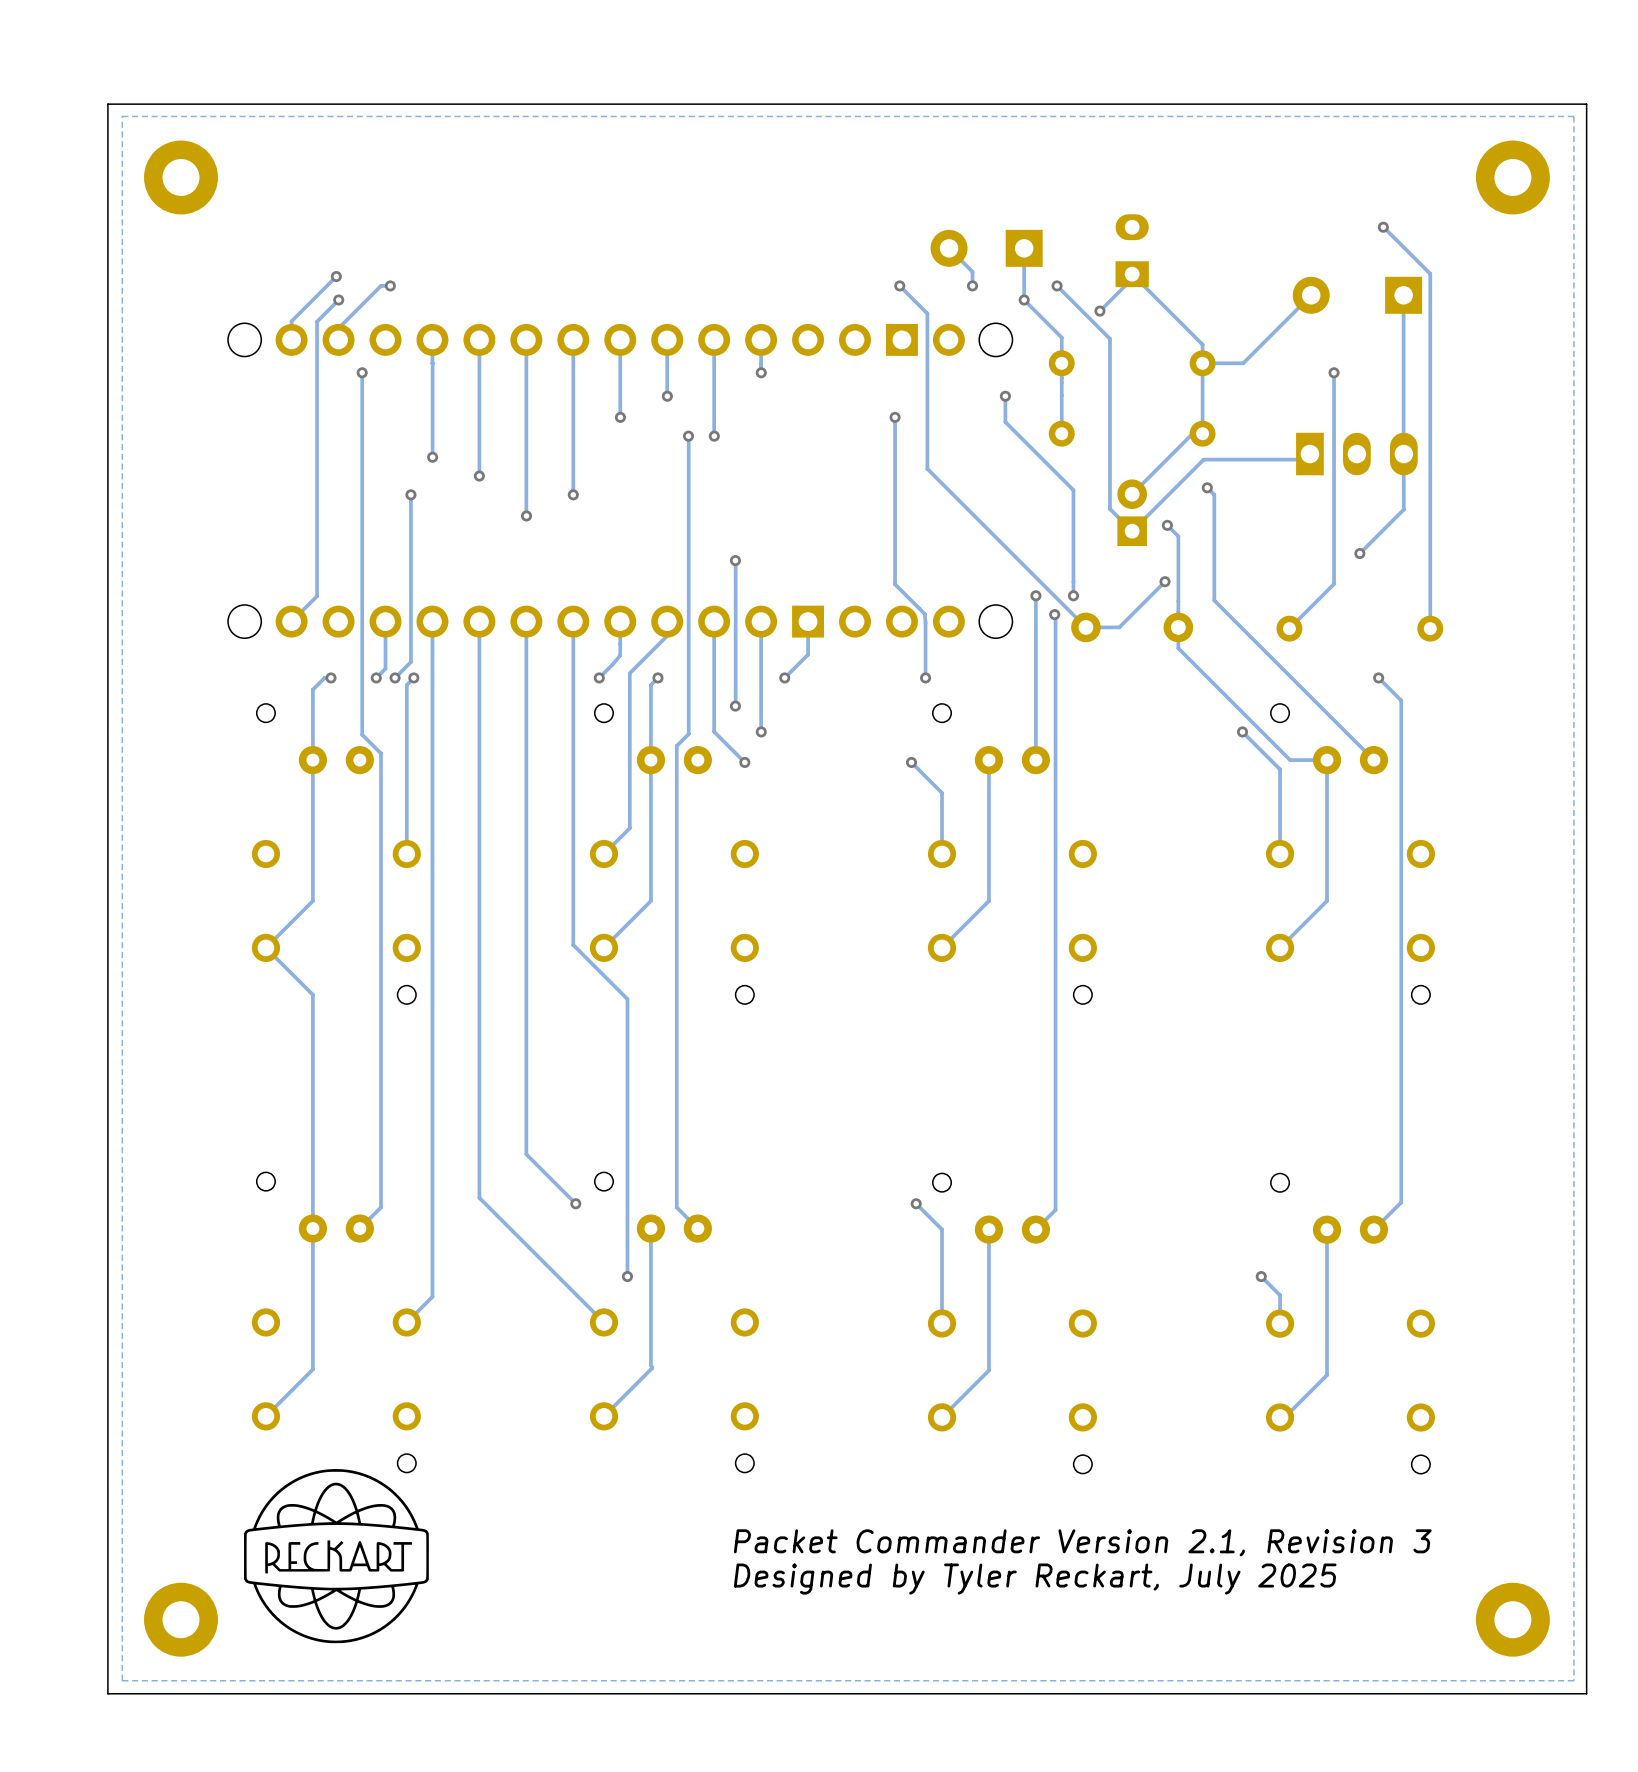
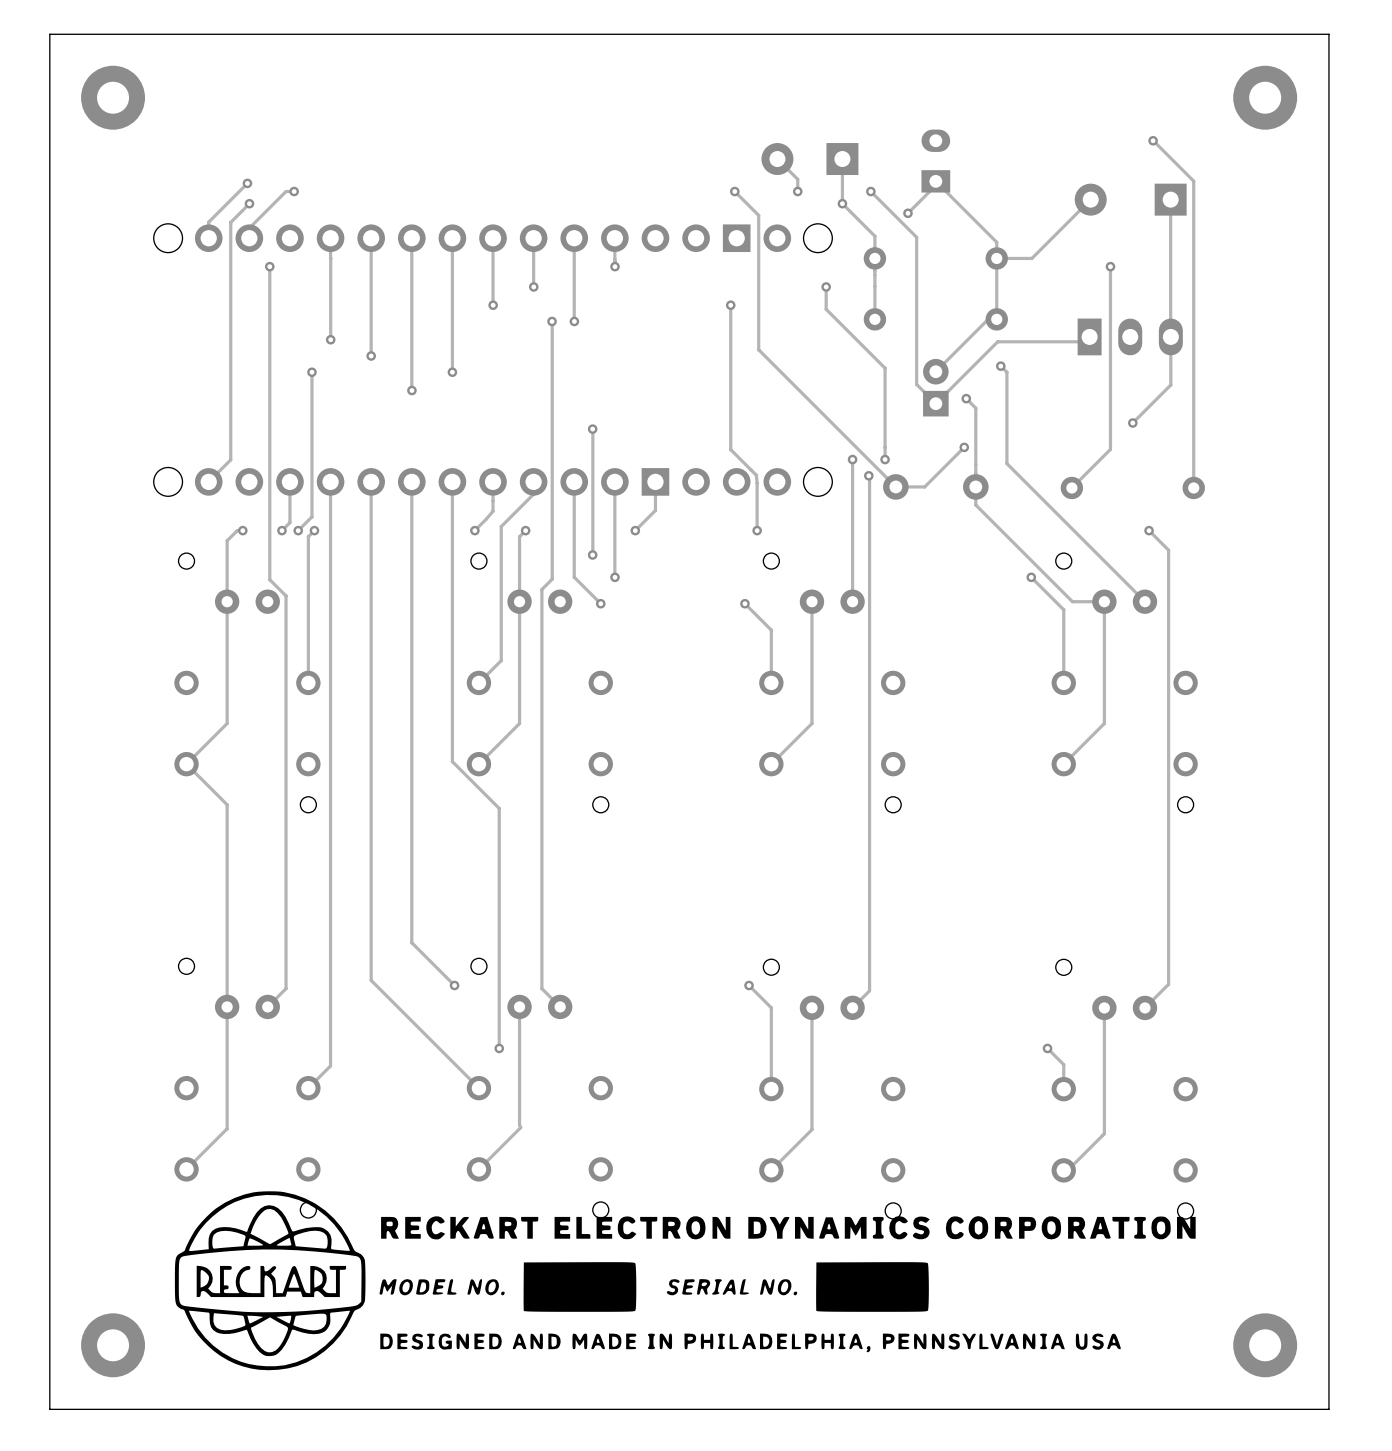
zone outline: (1573, 116) (122, 116) (122, 1680) (1573, 1680) (1573, 116) -> none
drawing: none -> [174, 1191, 1196, 1371]
drawing: [244, 1469, 429, 1644] -> none
text: Packet Commander Version 2.1, Revision 3 (1082, 1542) -> none
text: Designed by Tyler Reckart, July 2025 (1035, 1579) -> none

